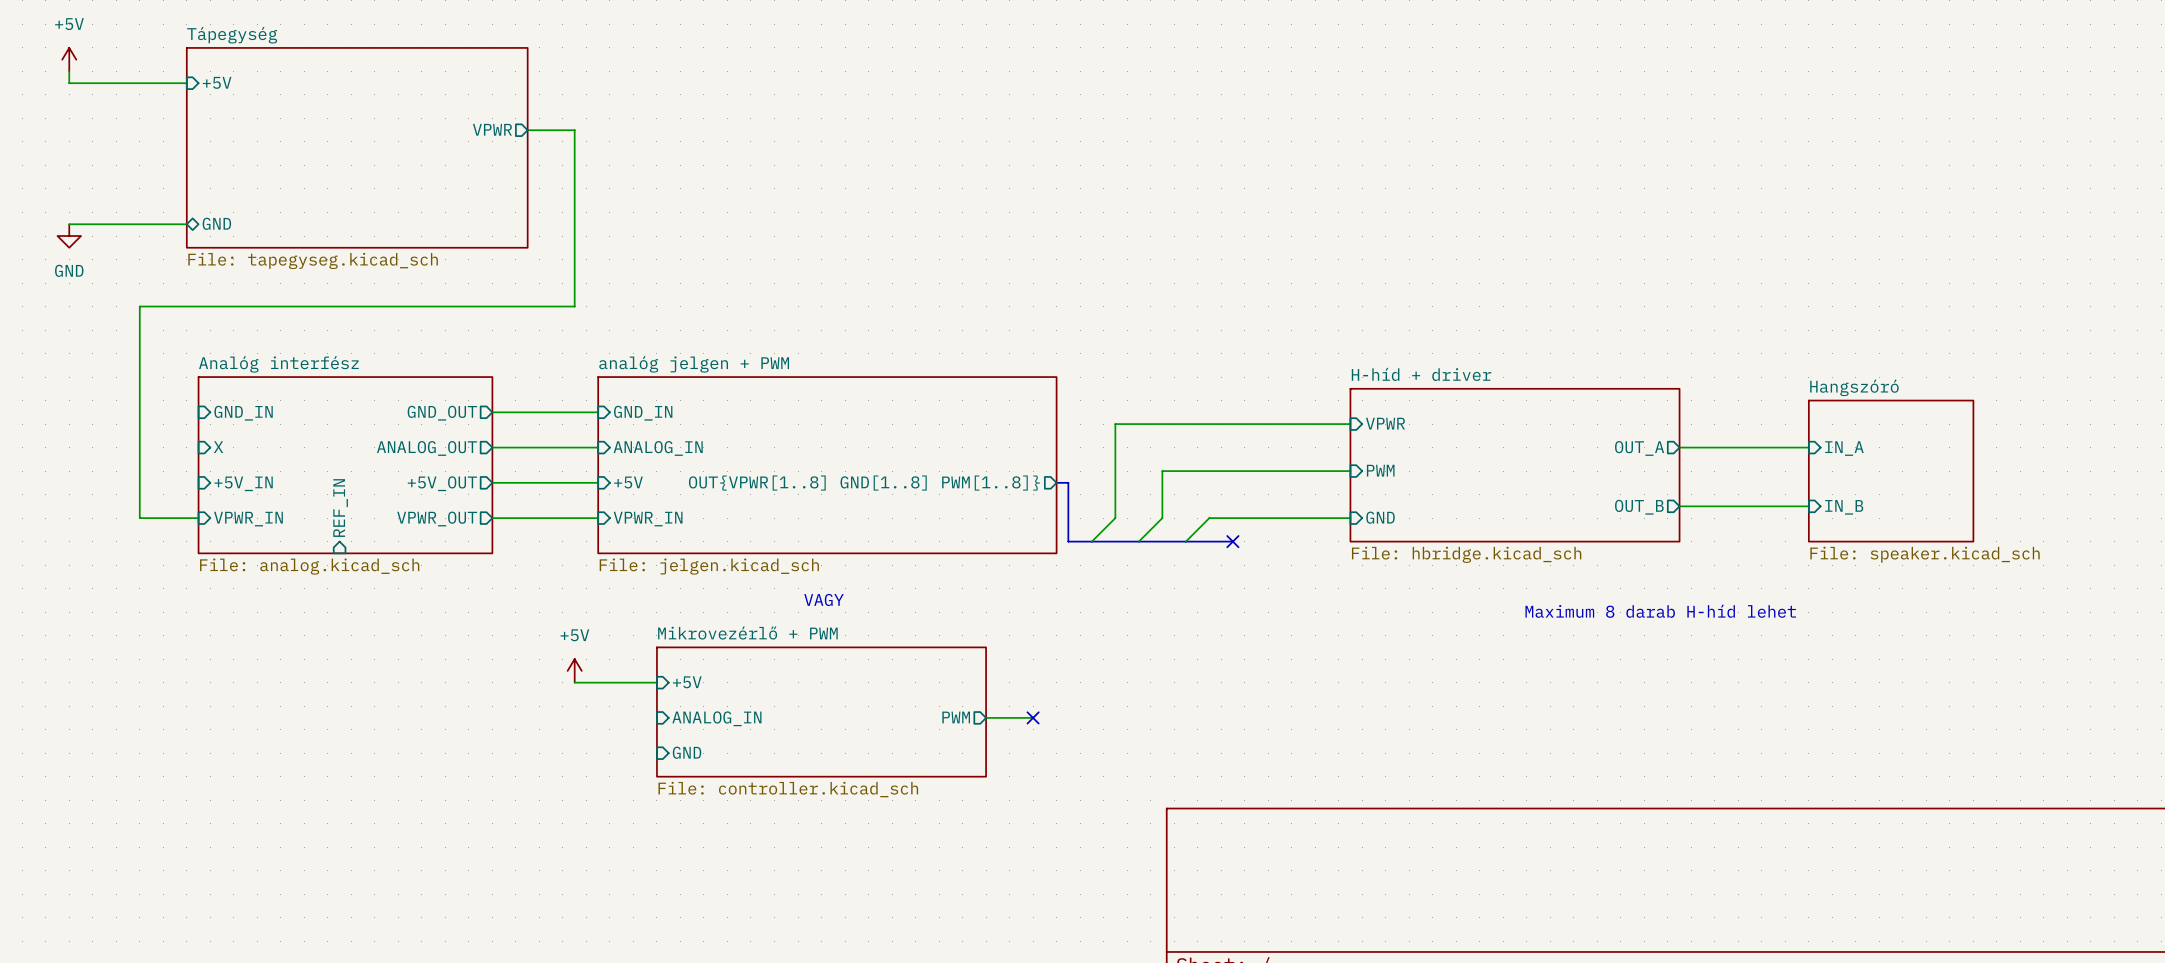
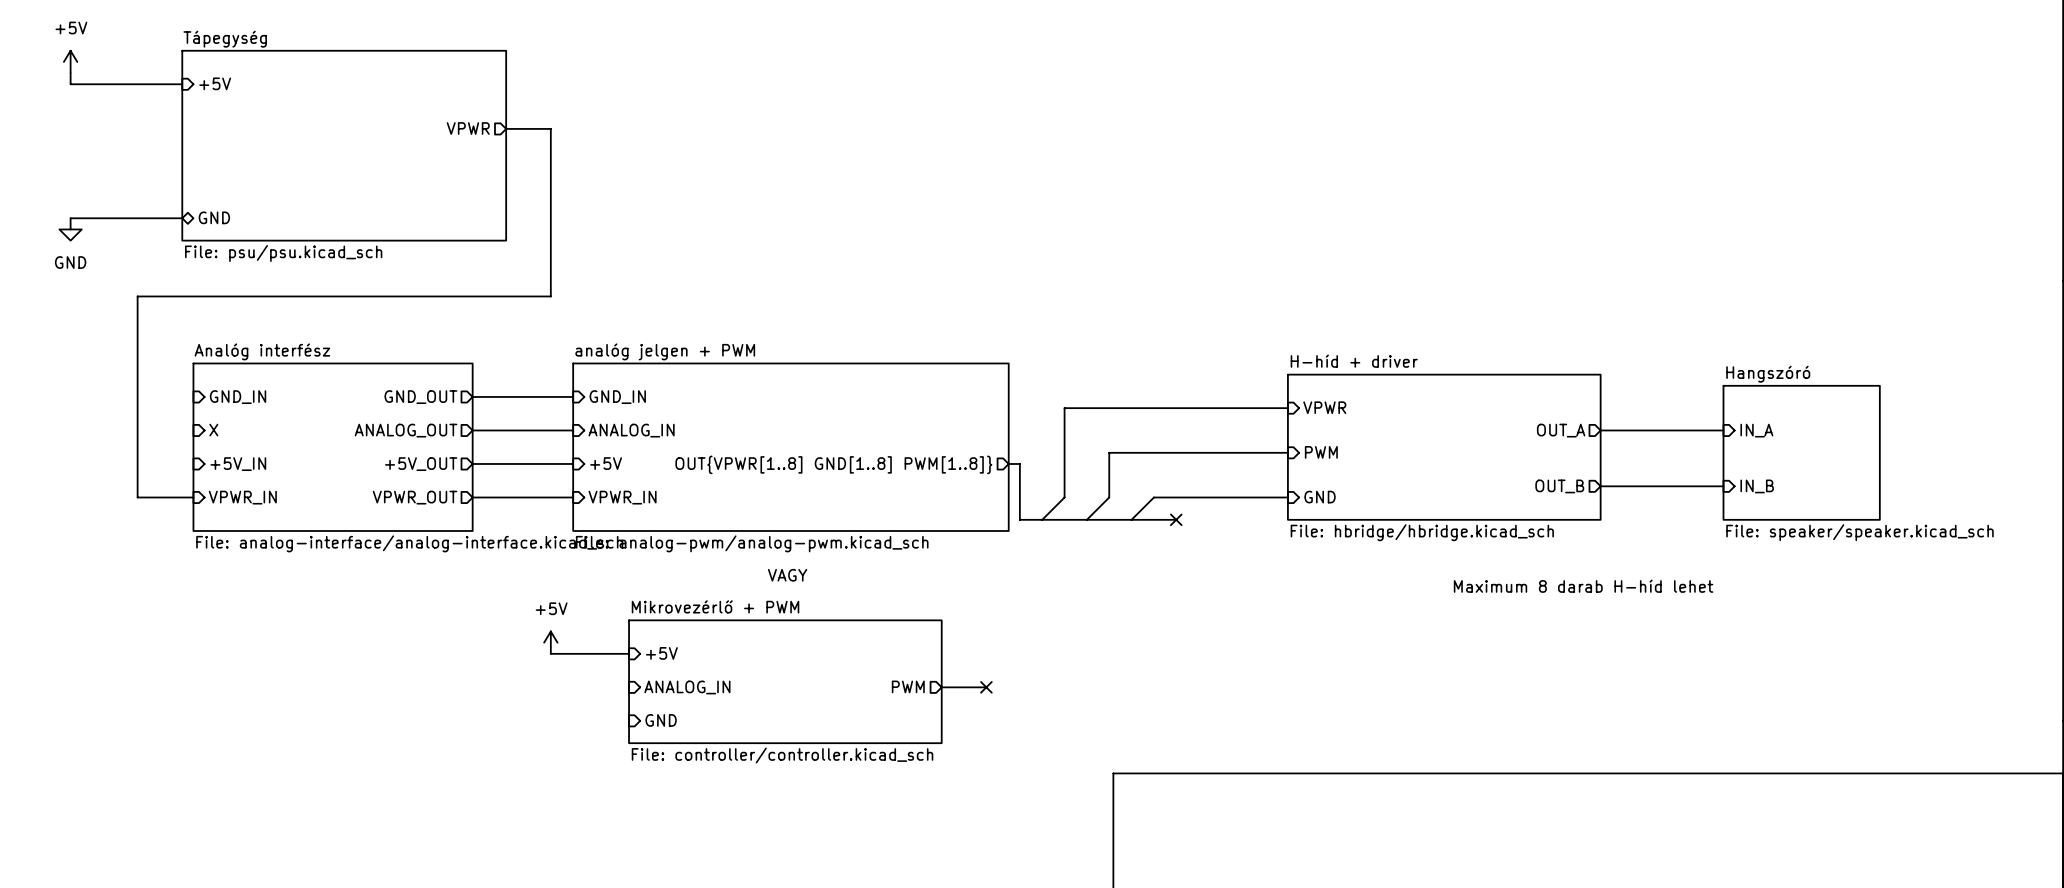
sheet Tápegység value: File: tapegyseg.kicad_sch (313, 260) -> File: psu/psu.kicad_sch (283, 253)
sheet pin: REF_IN (340, 508) -> none
sheet H-híd + driver value: File: hbridge.kicad_sch (1466, 554) -> File: hbridge/hbridge.kicad_sch (1422, 532)
sheet Hangszóró value: File: speaker.kicad_sch (1925, 554) -> File: speaker/speaker.kicad_sch (1859, 532)
sheet Analóg interfész value: File: analog.kicad_sch (309, 566) -> File: analog-interface/analog-interface.kicad_sch (409, 543)
sheet analóg jelgen + PWM value: File: jelgen.kicad_sch (709, 566) -> File: analog-pwm/analog-pwm.kicad_sch (752, 543)
sheet Mikrovezérlő + PWM value: File: controller.kicad_sch (788, 789) -> File: controller/controller.kicad_sch (782, 755)

